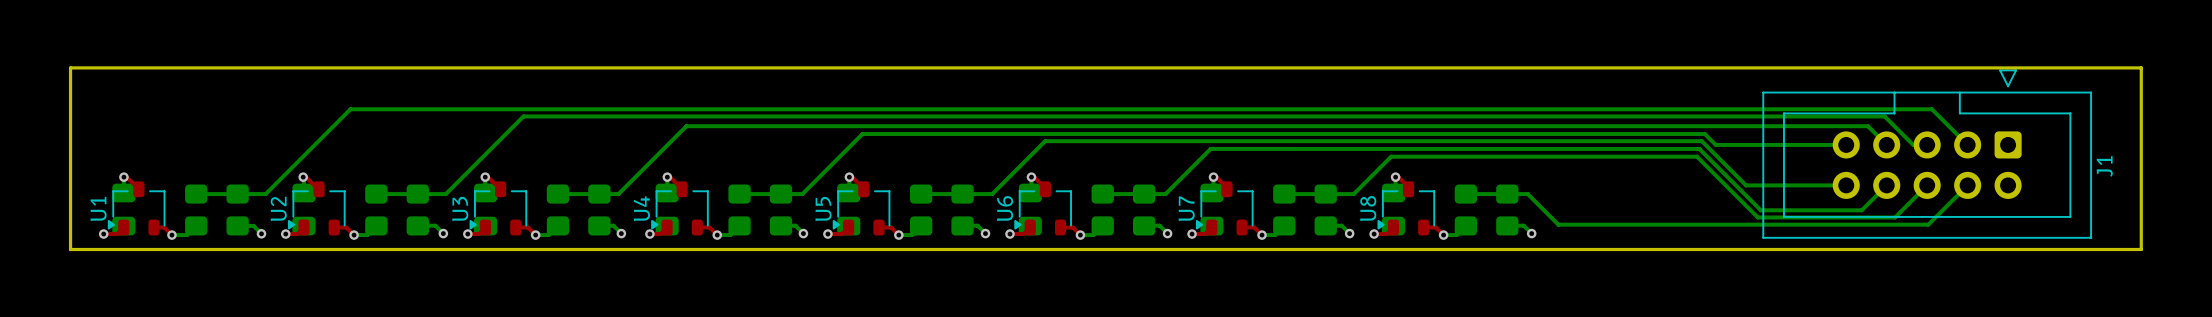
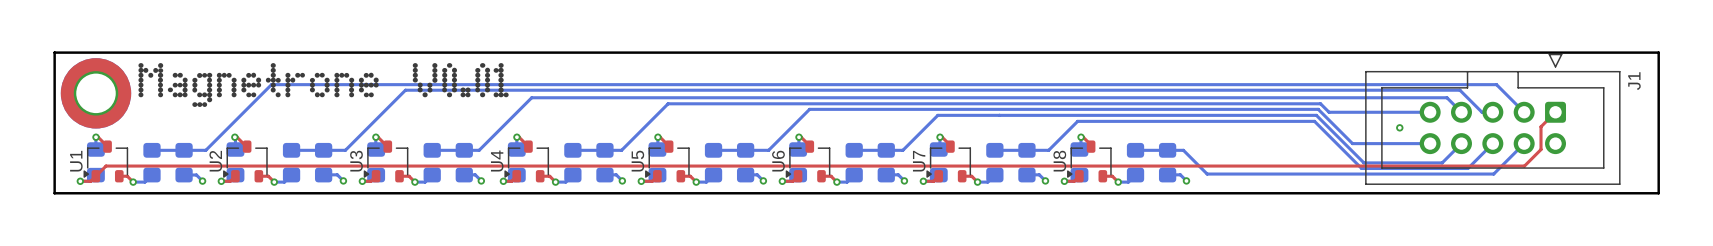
drawing: none -> [138, 63, 379, 107]
drawing: none -> [412, 63, 509, 98]
part: none -> (96, 93)
top track: none -> (1555, 112) (1541, 126) (1541, 149) (1524, 166) (106, 166) (95, 176)
via: none -> (1399, 127)
J1 name position: J1 (2104, 166) -> J1 (1634, 81)

